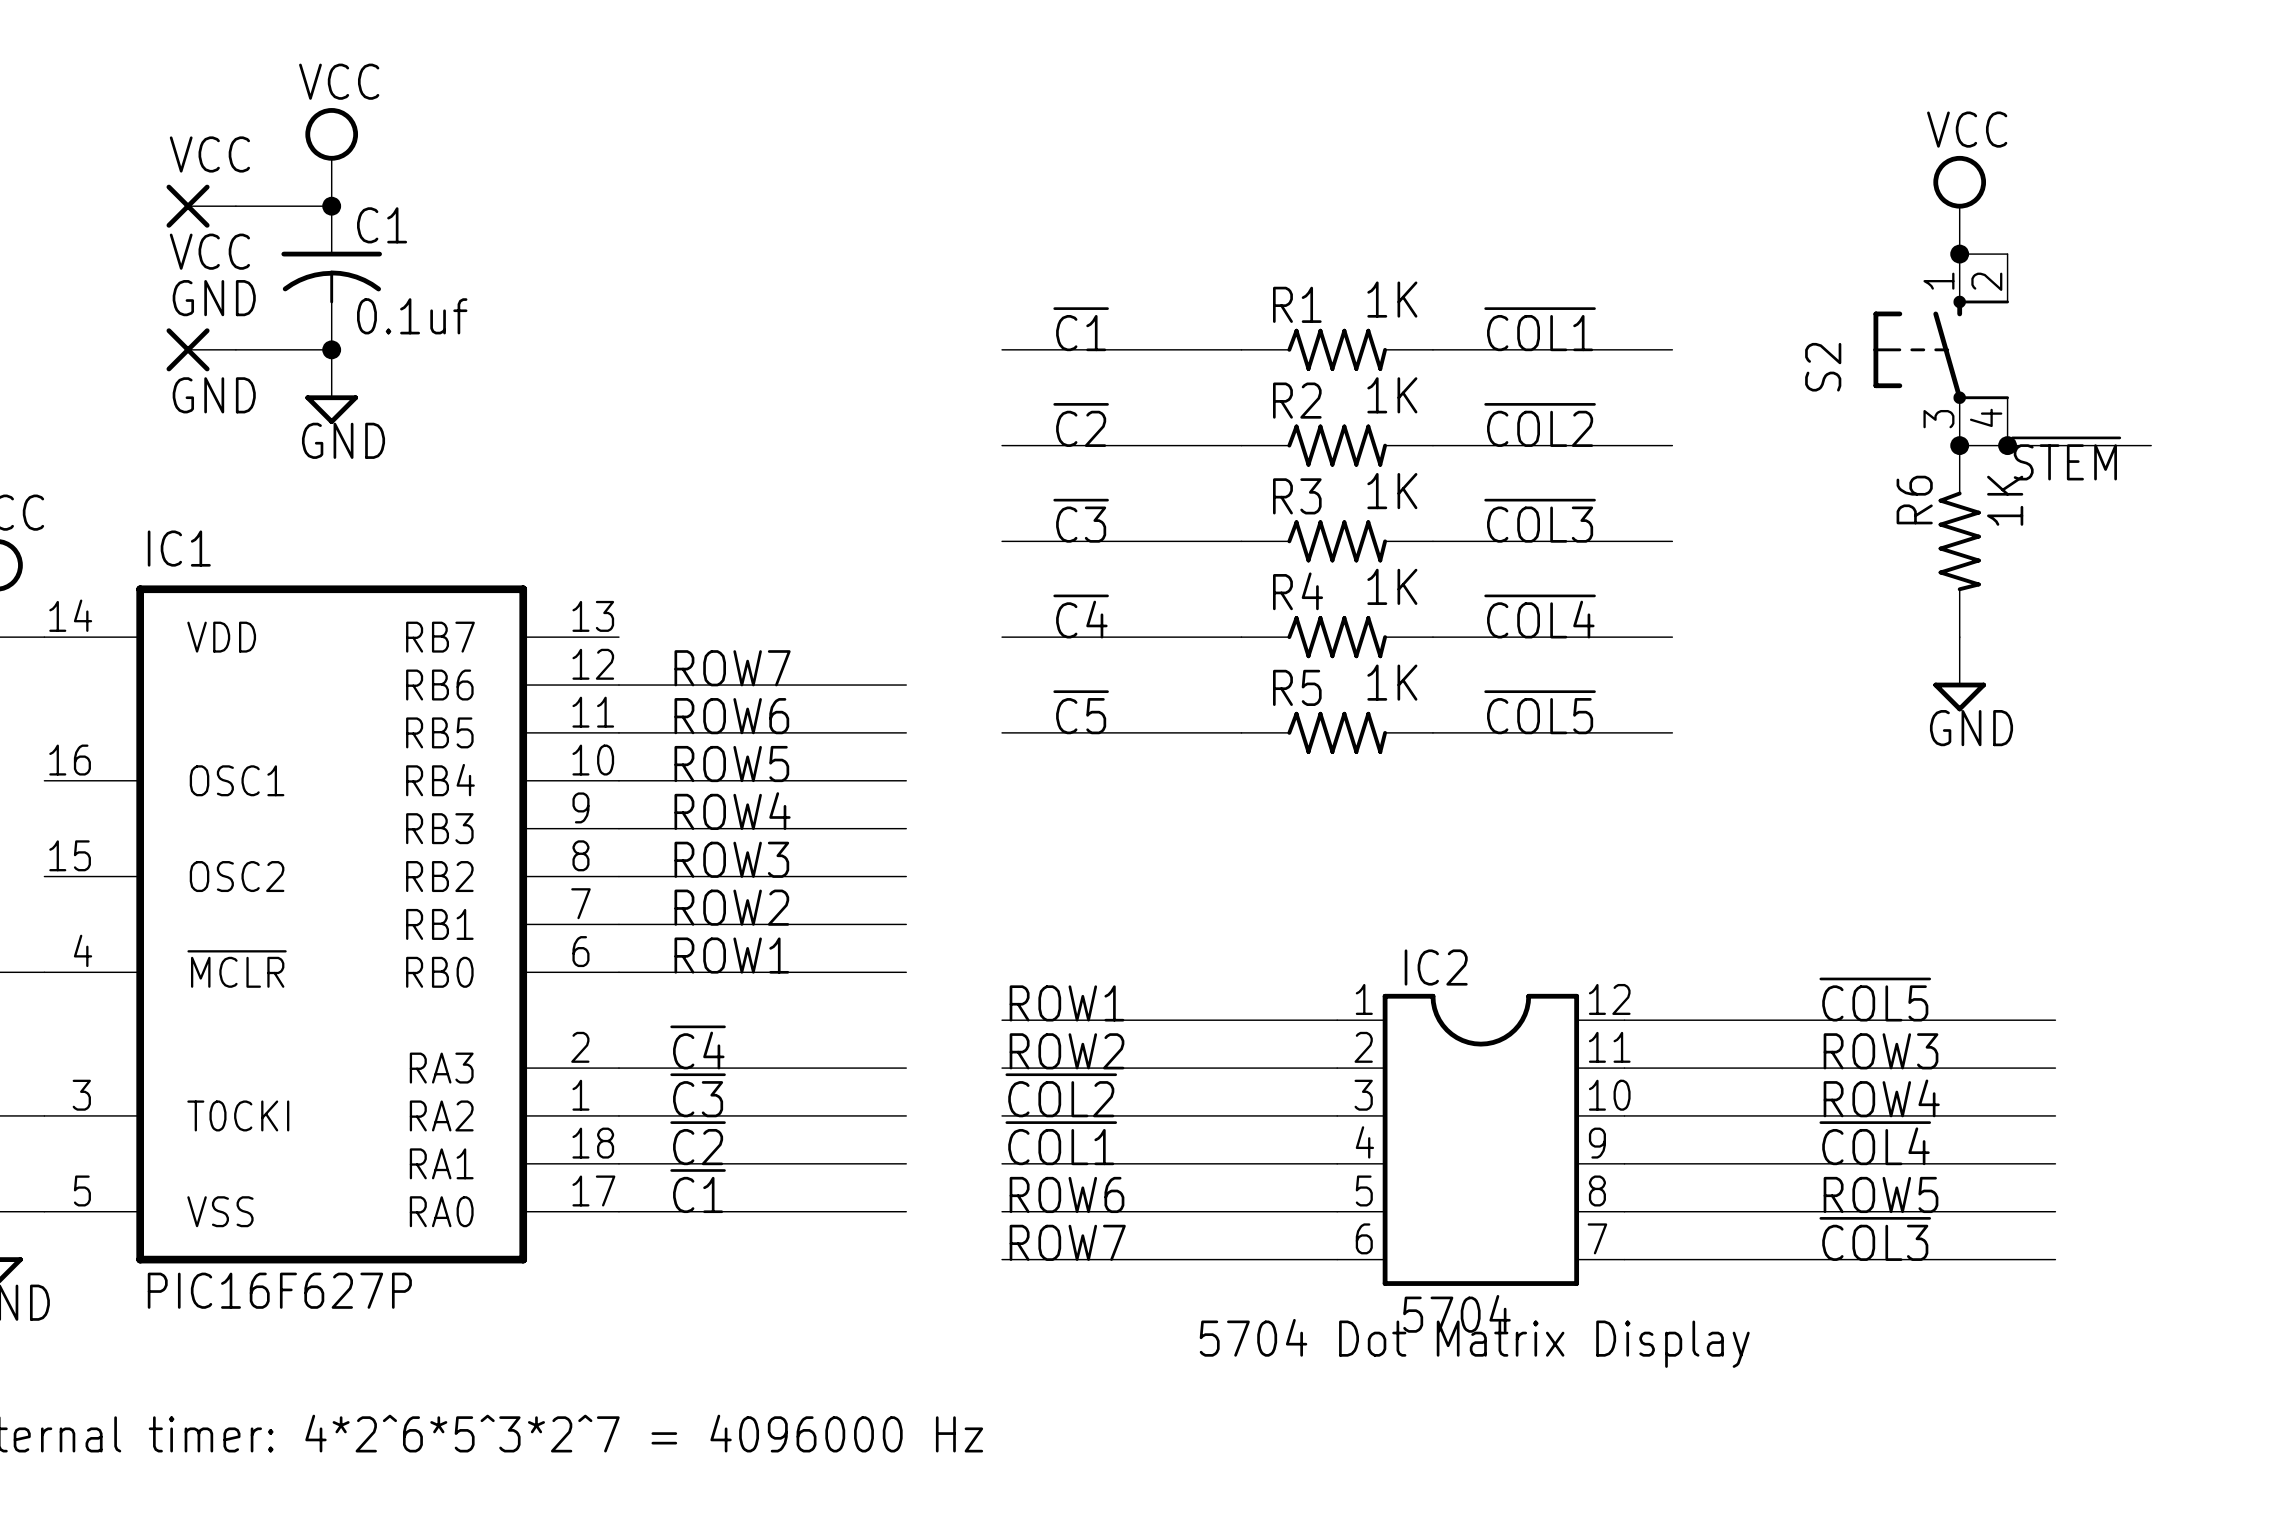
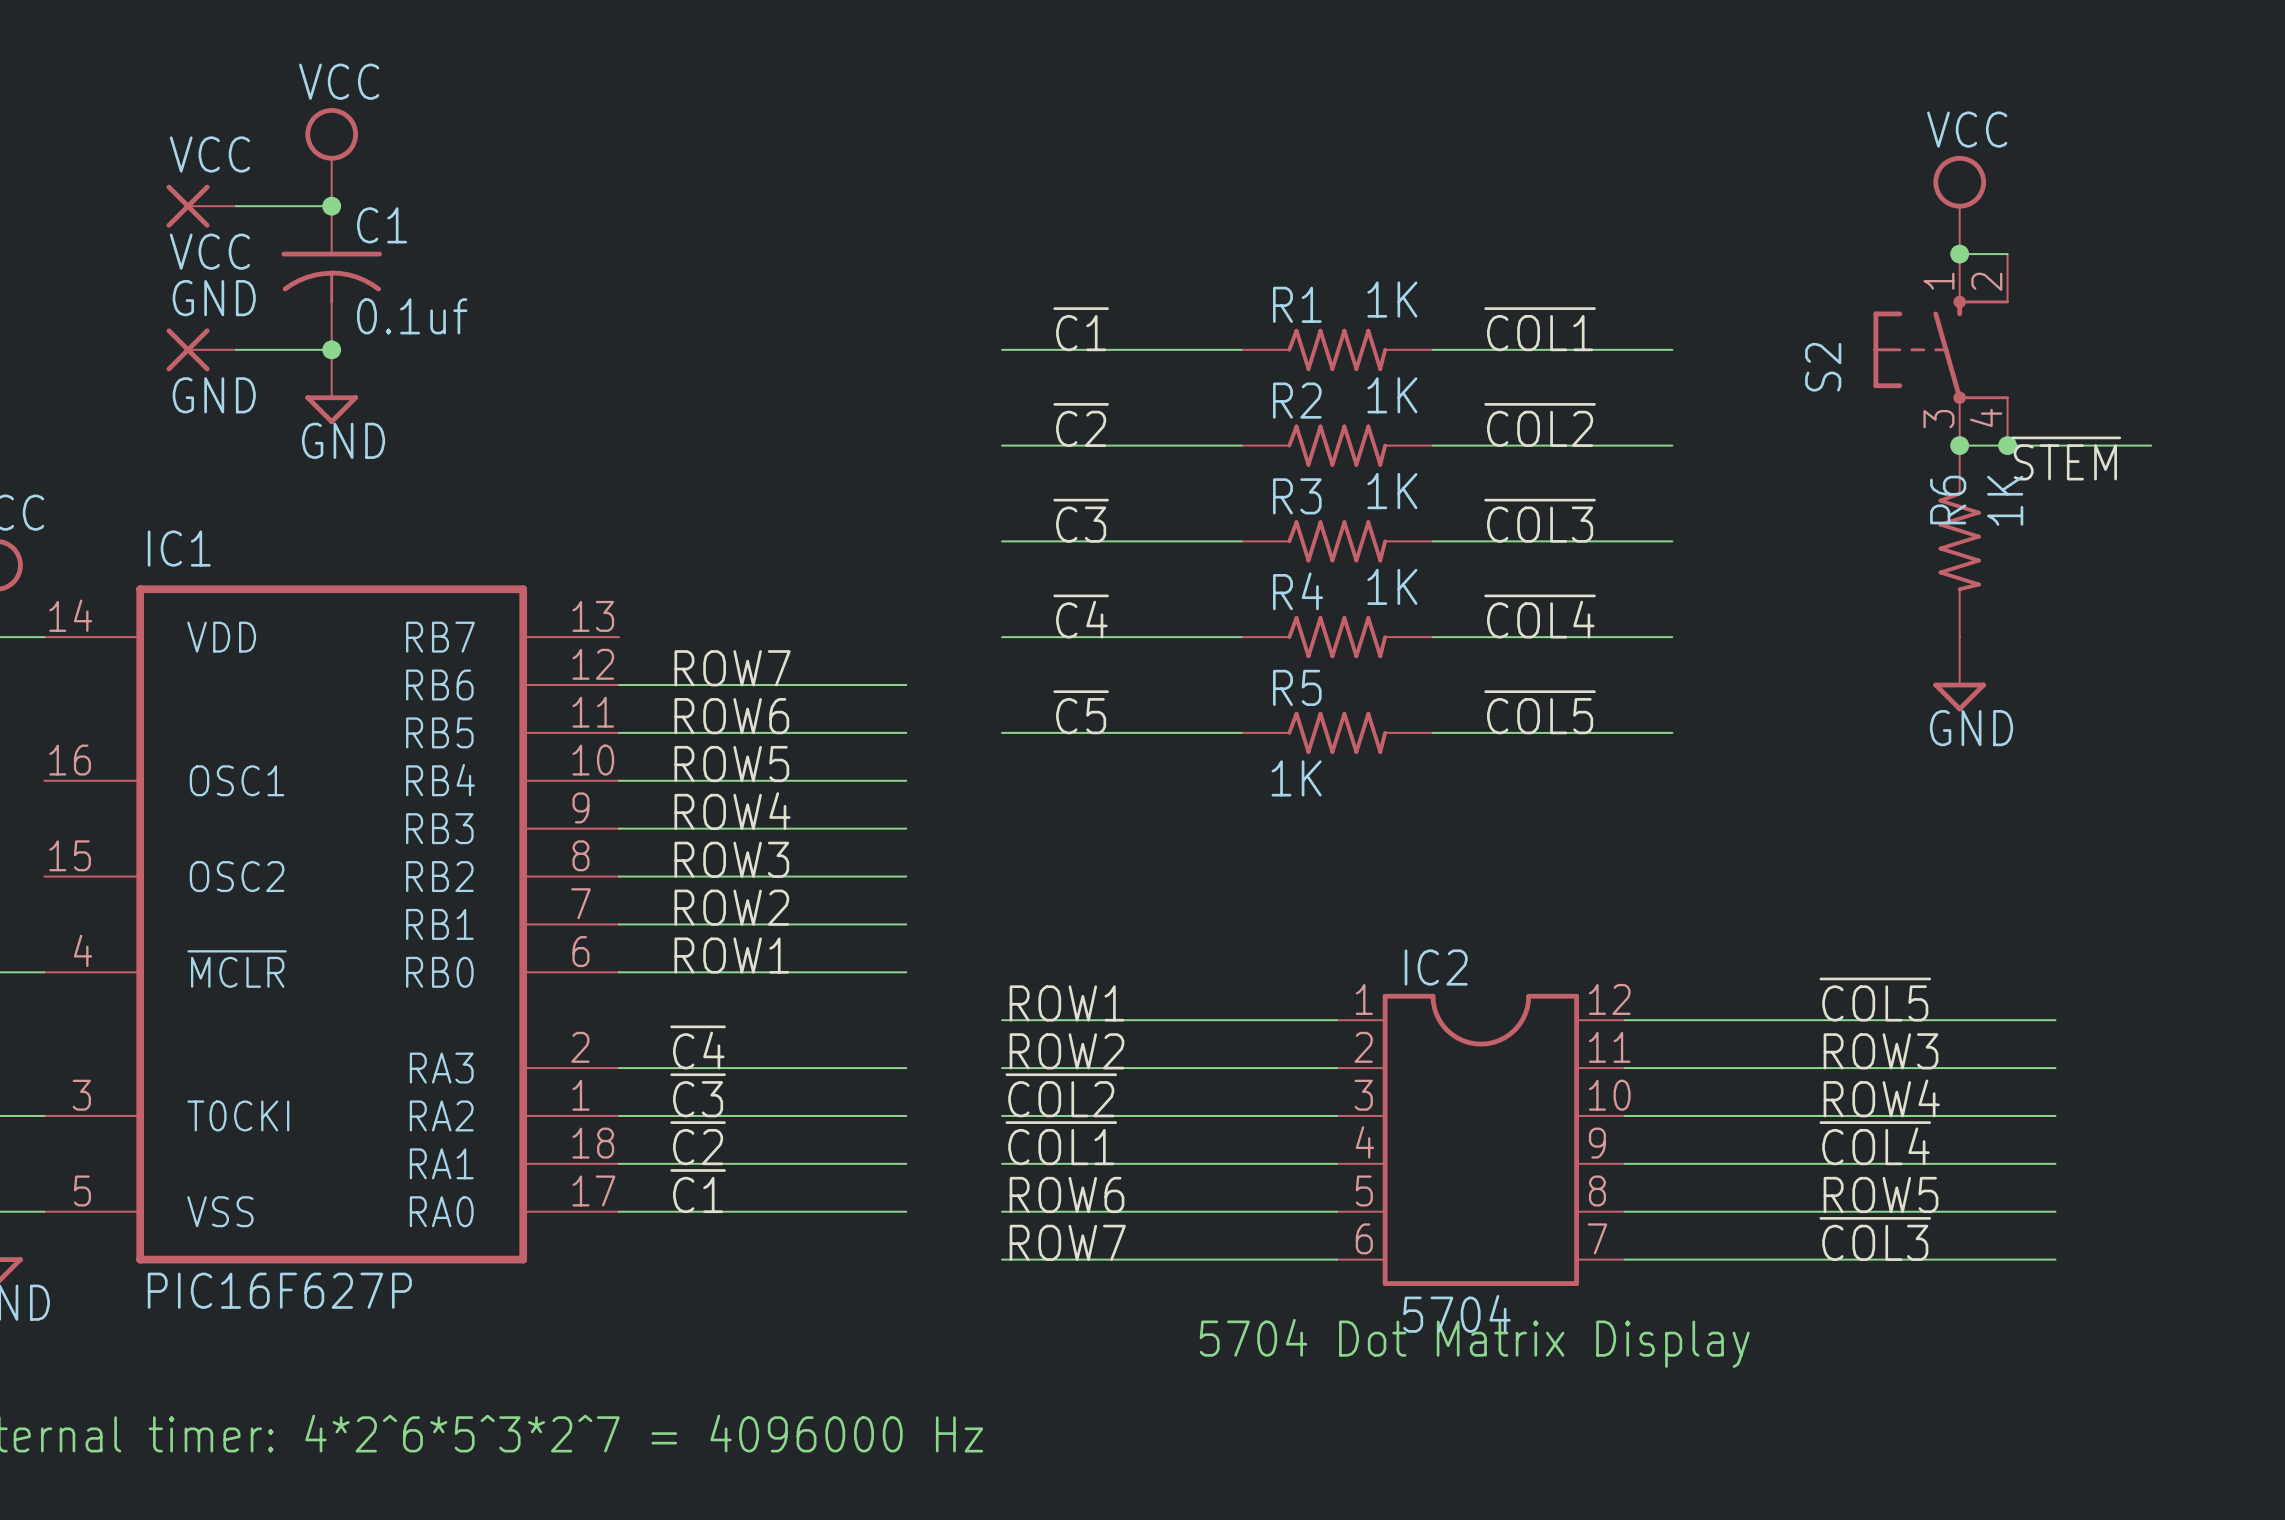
R6 name position: R6 (1914, 500) -> R6 (1948, 500)
R5 value position: 1K (1392, 682) -> 1K (1296, 778)

